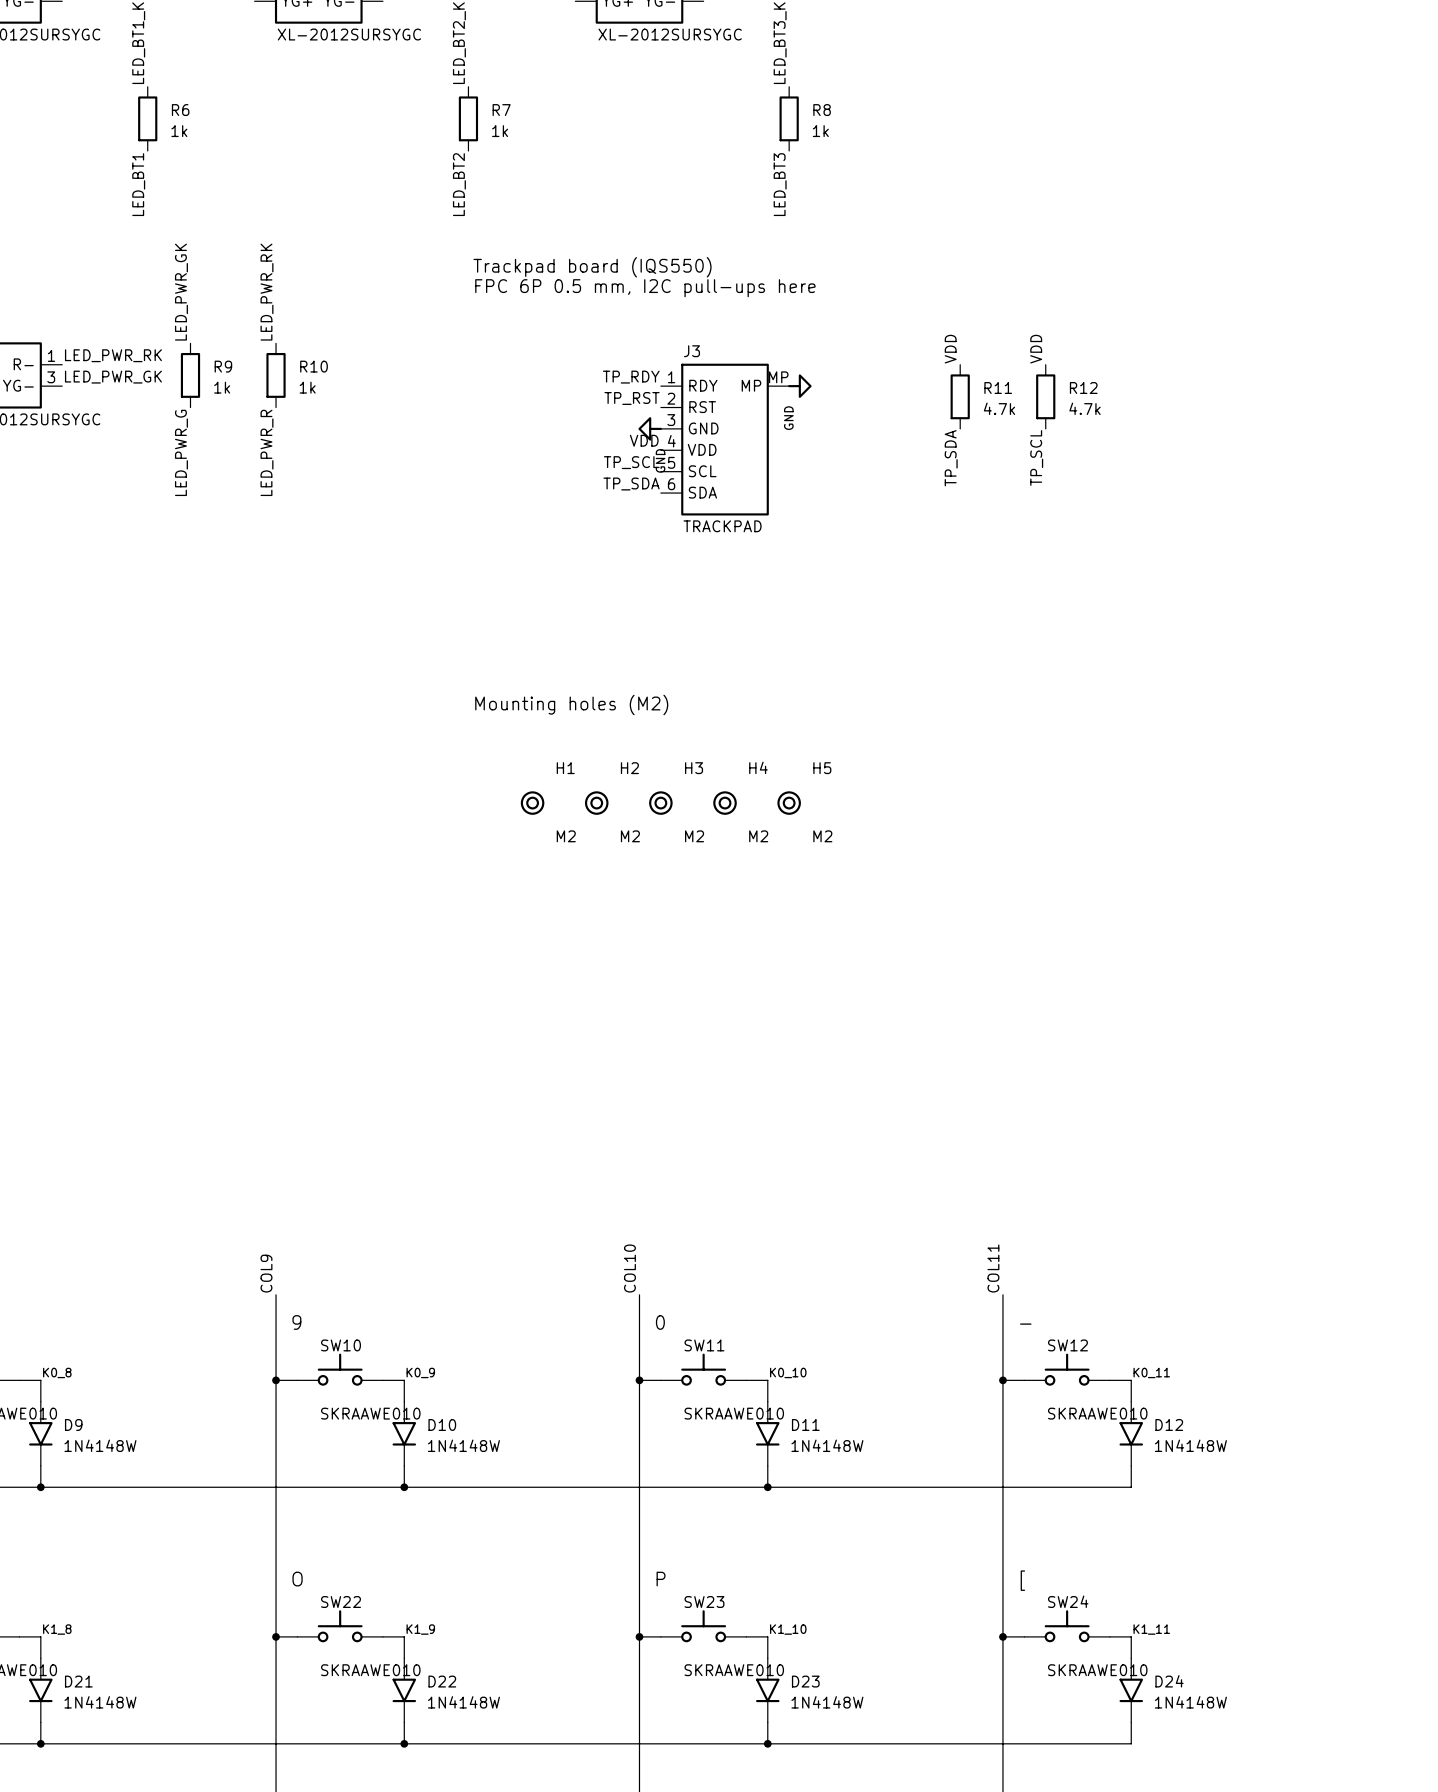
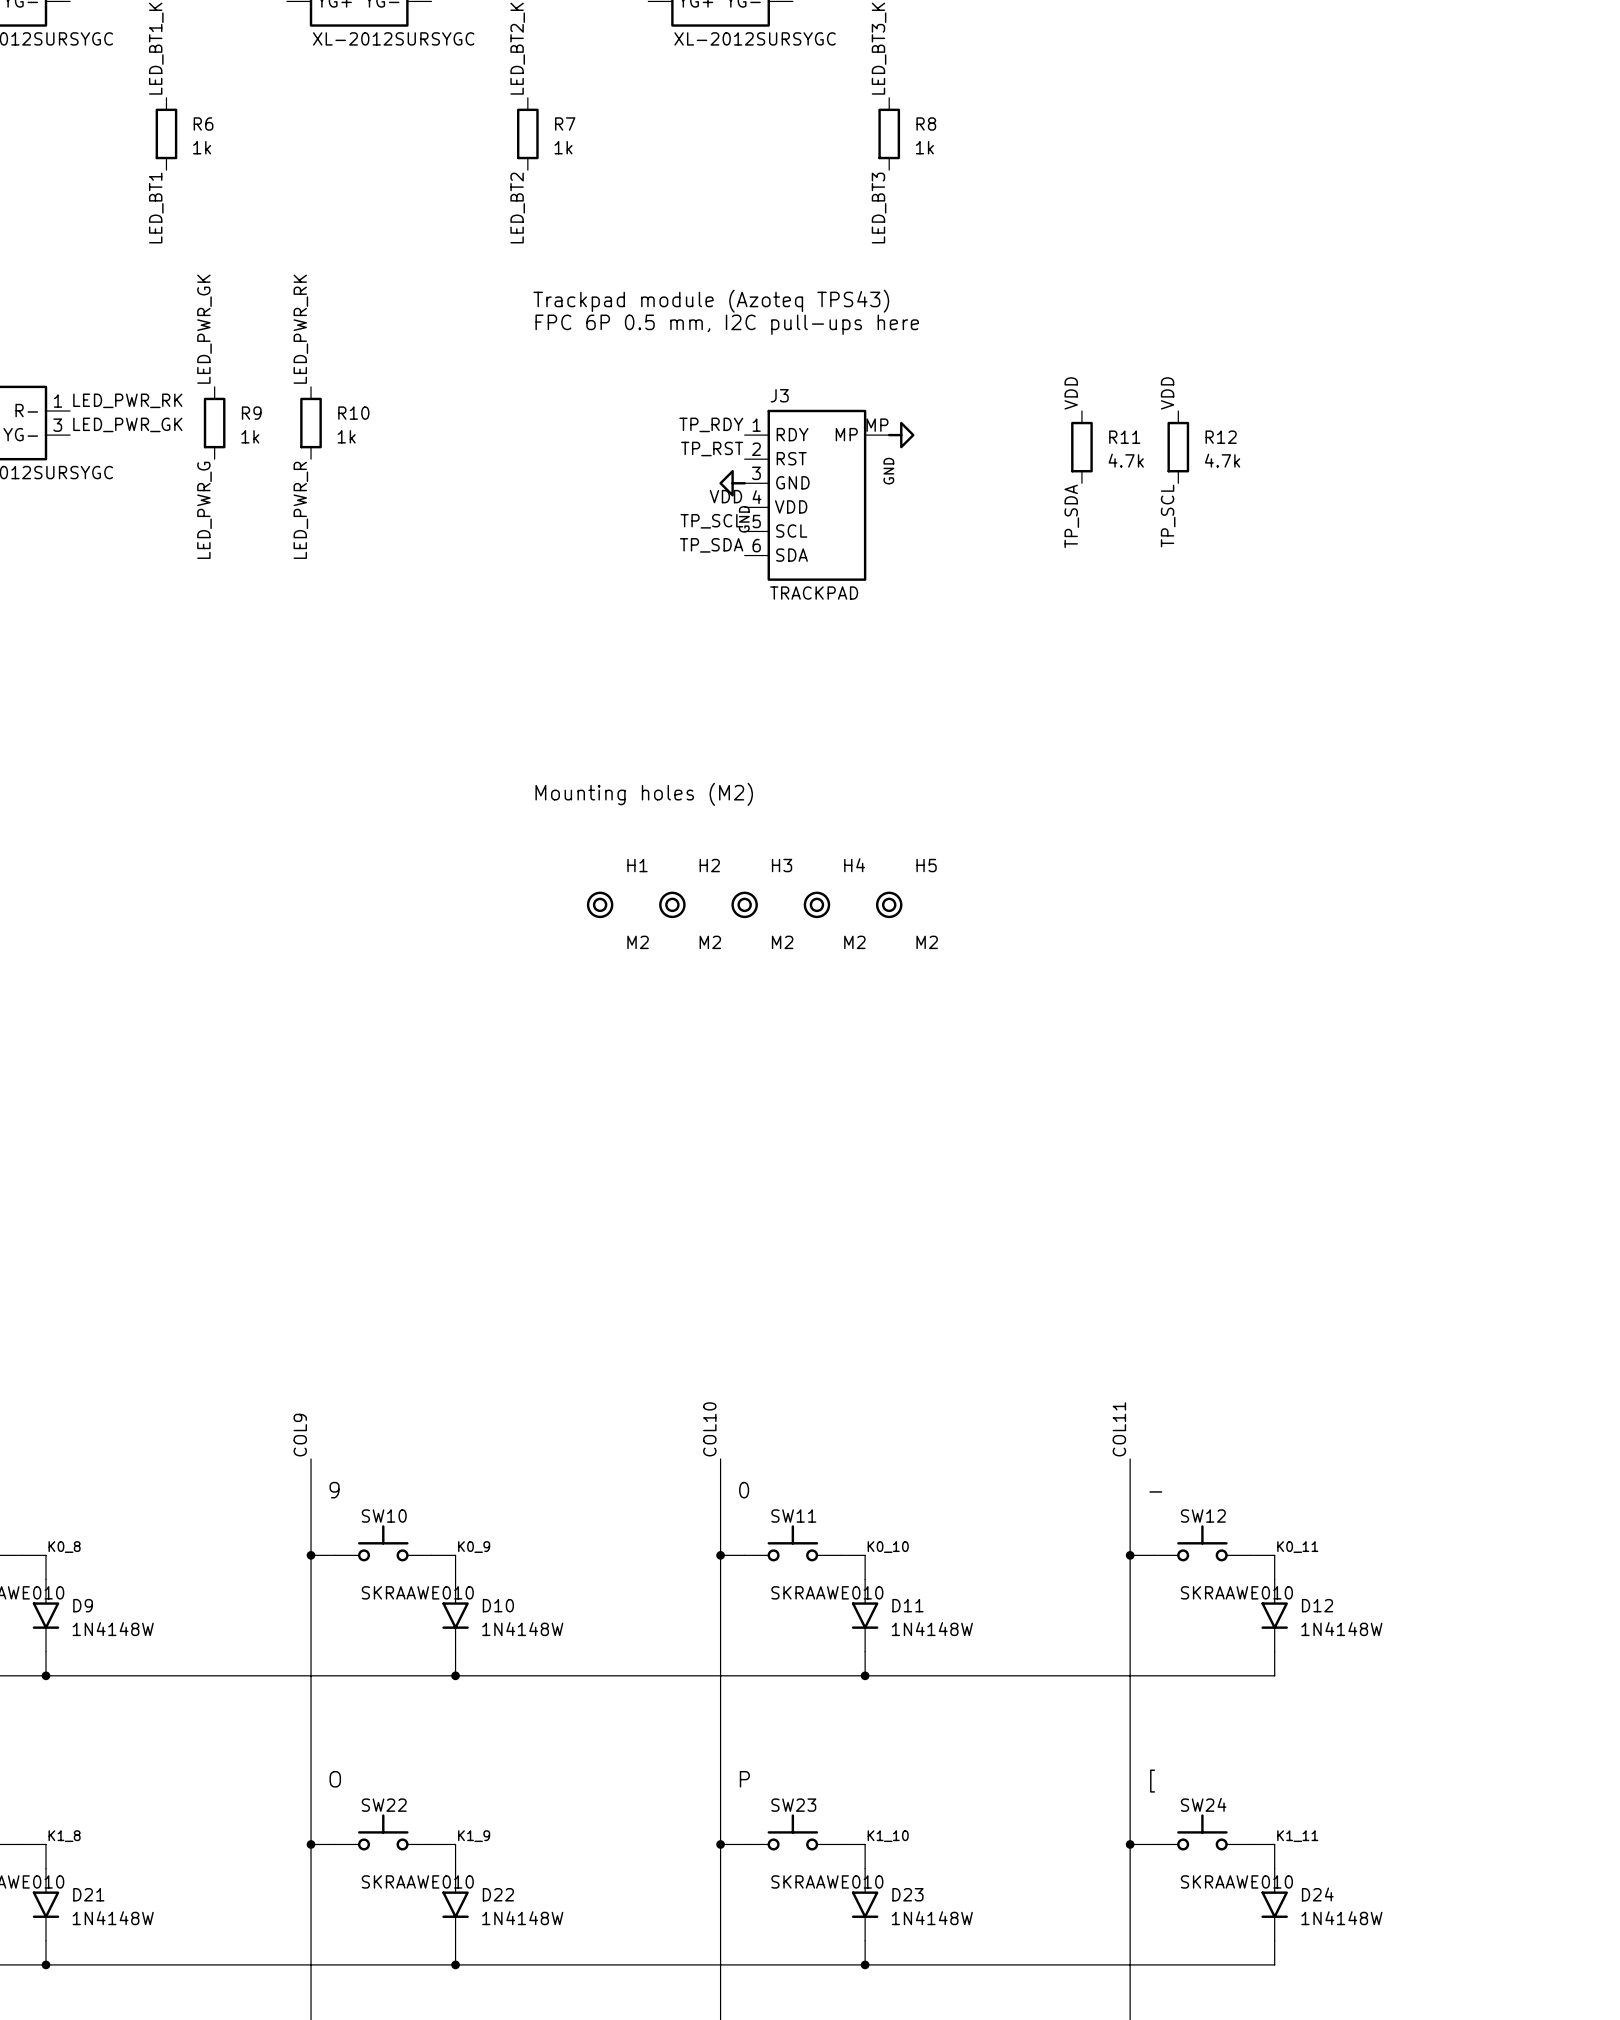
text: Trackpad board (IQS550) (592, 267) -> Trackpad module (Azoteq TPS43) (711, 301)

